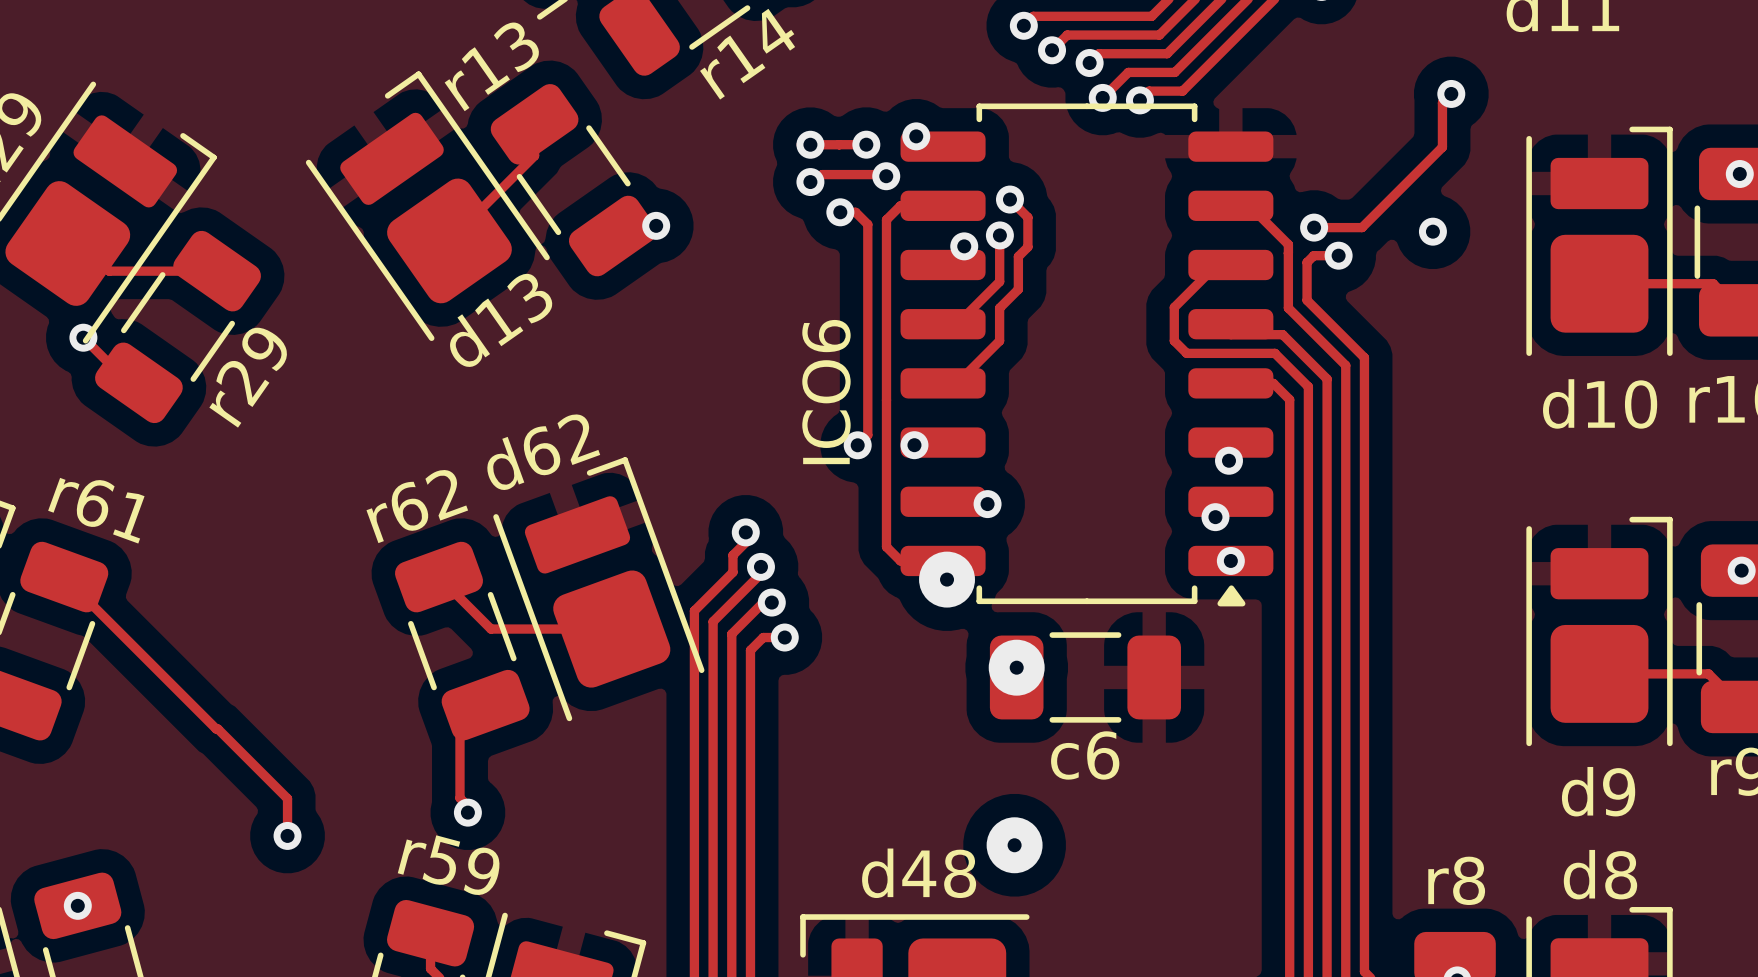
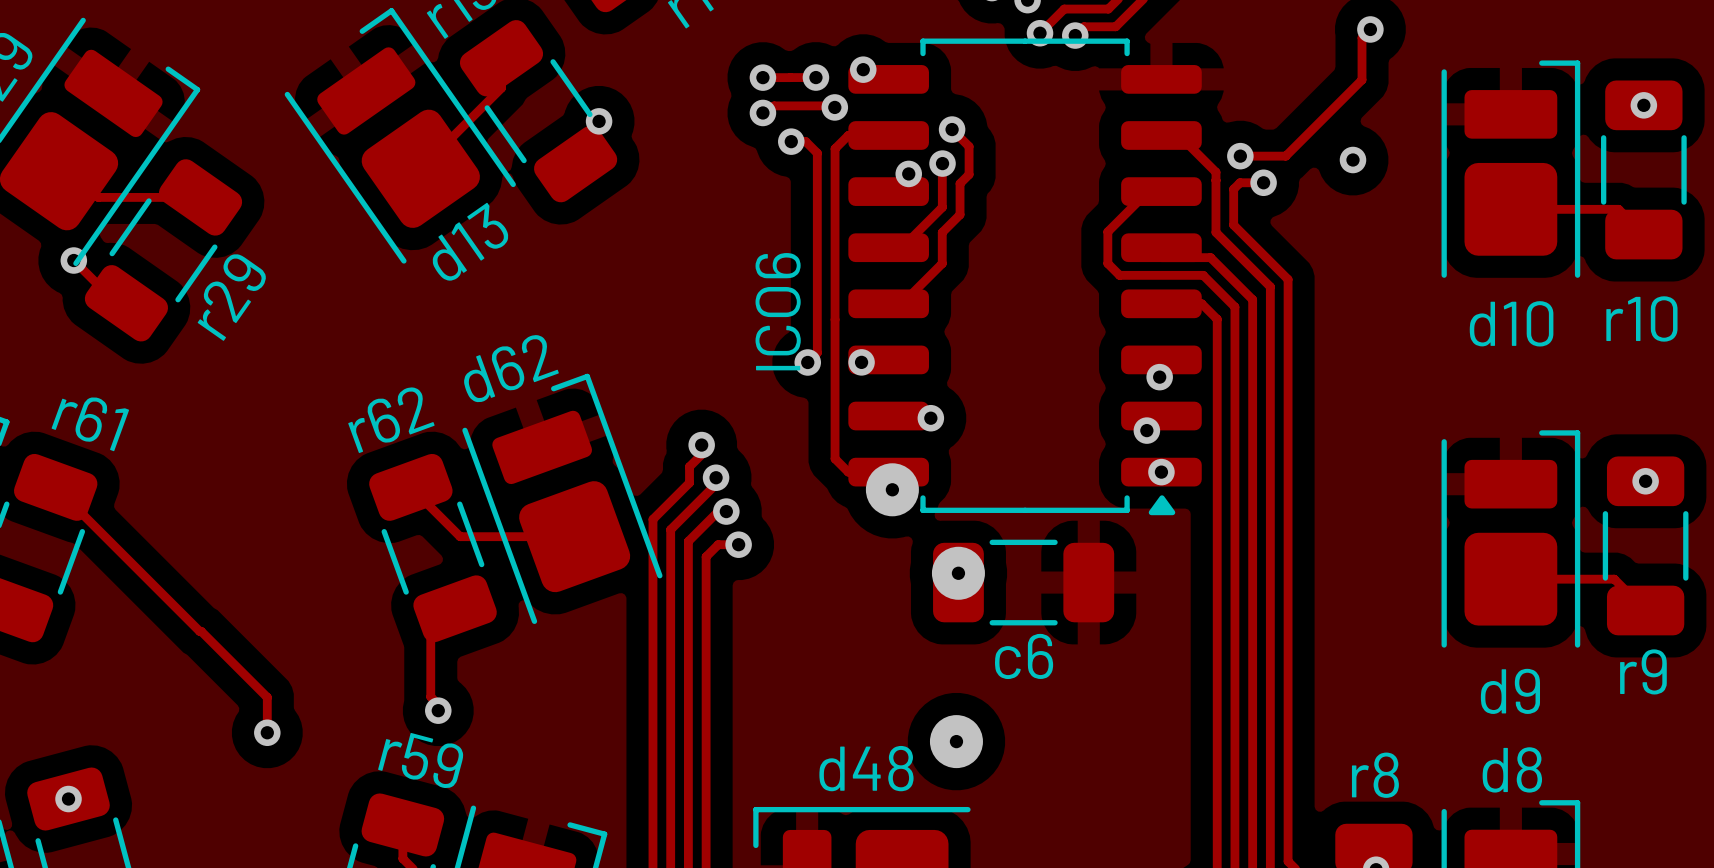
via position: (656, 225) -> (599, 121)

